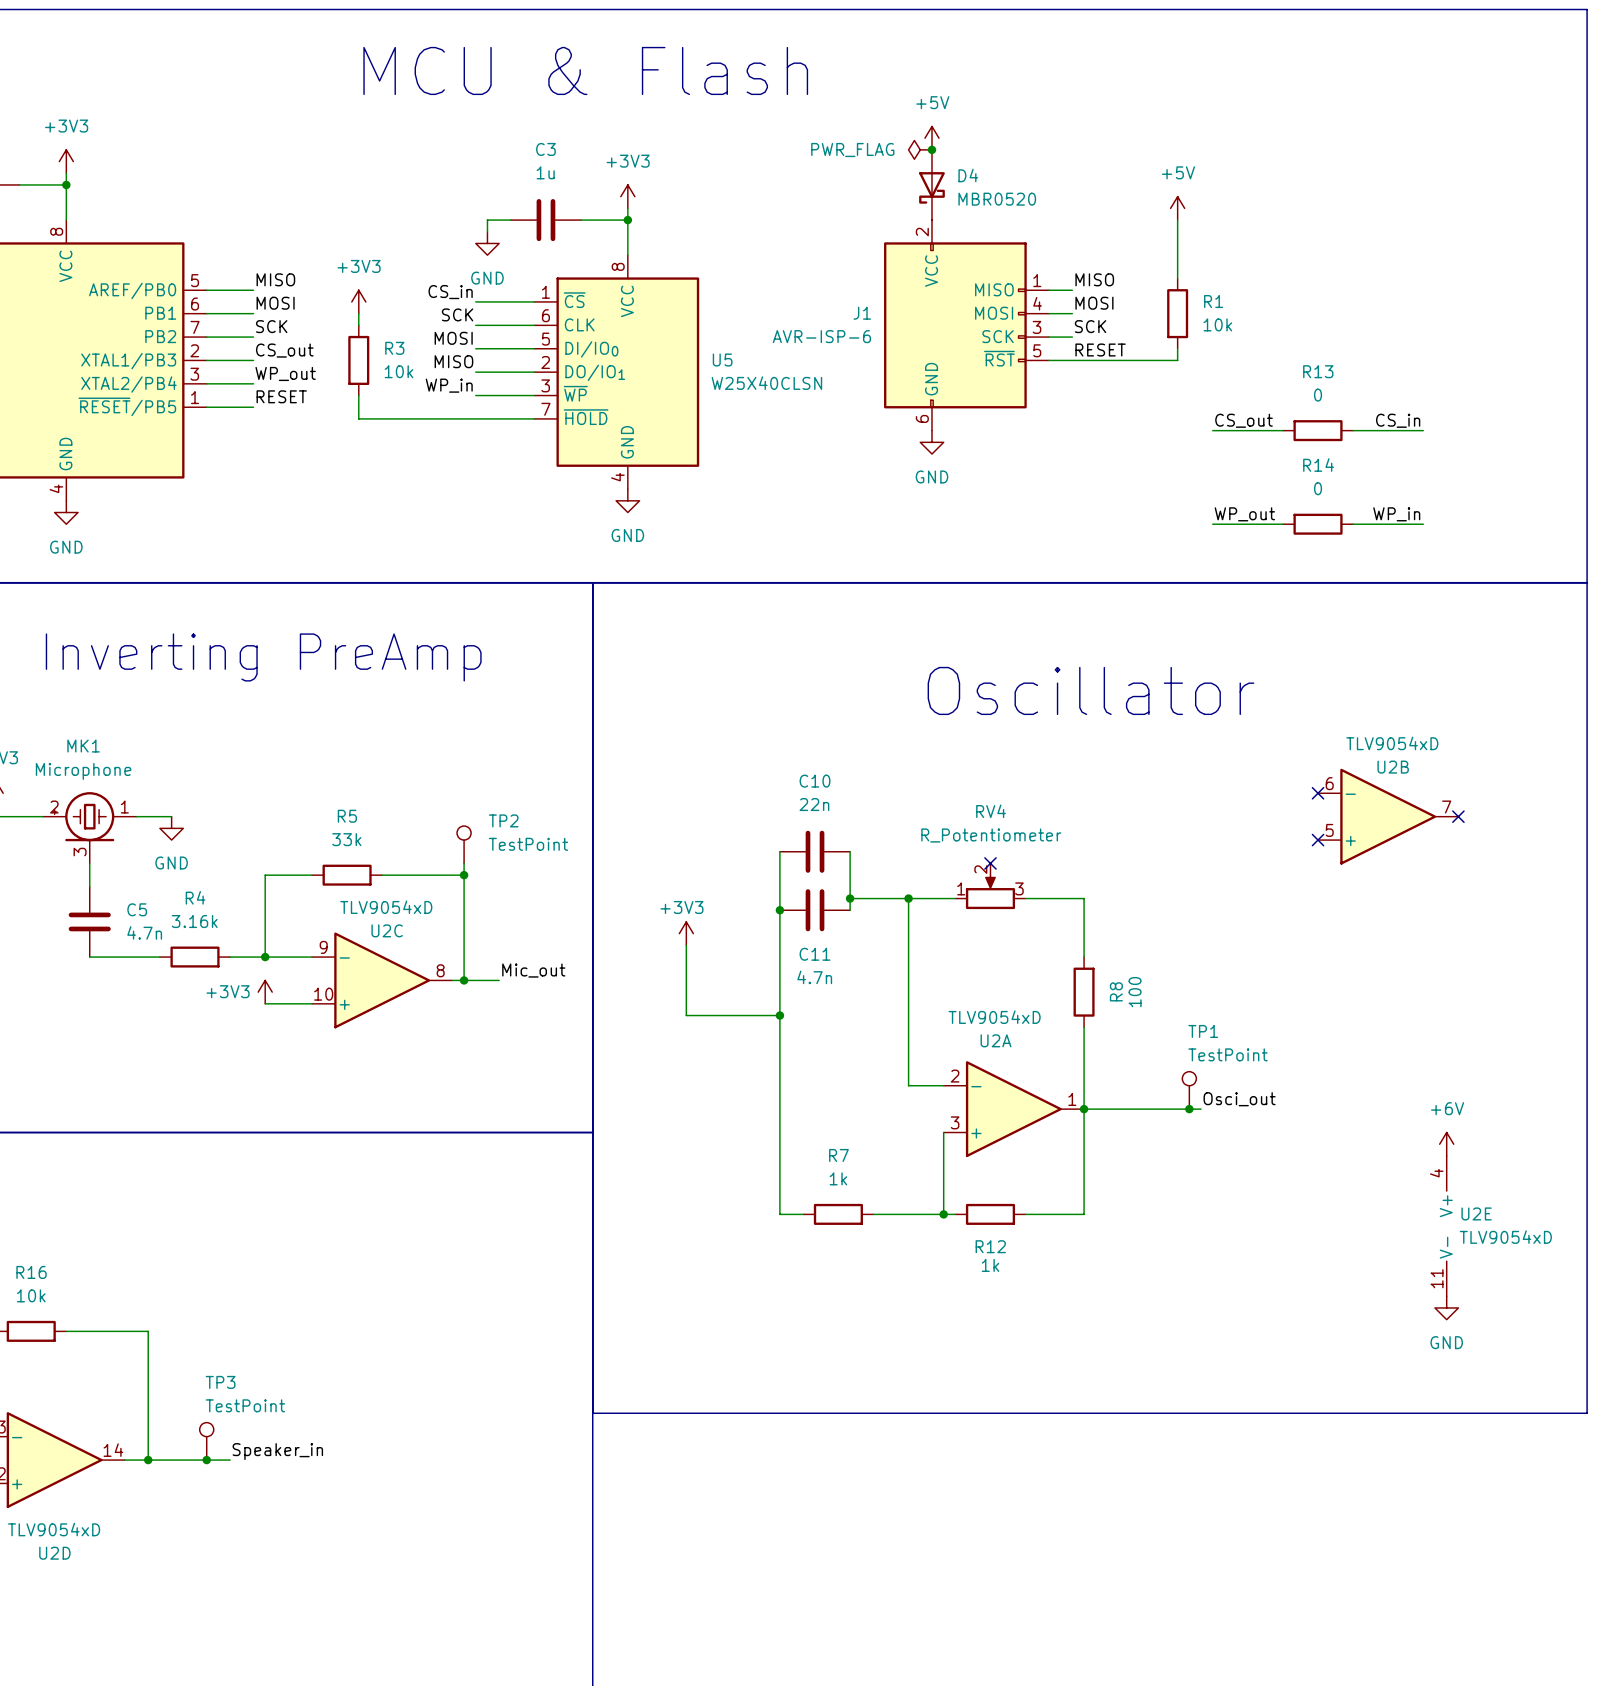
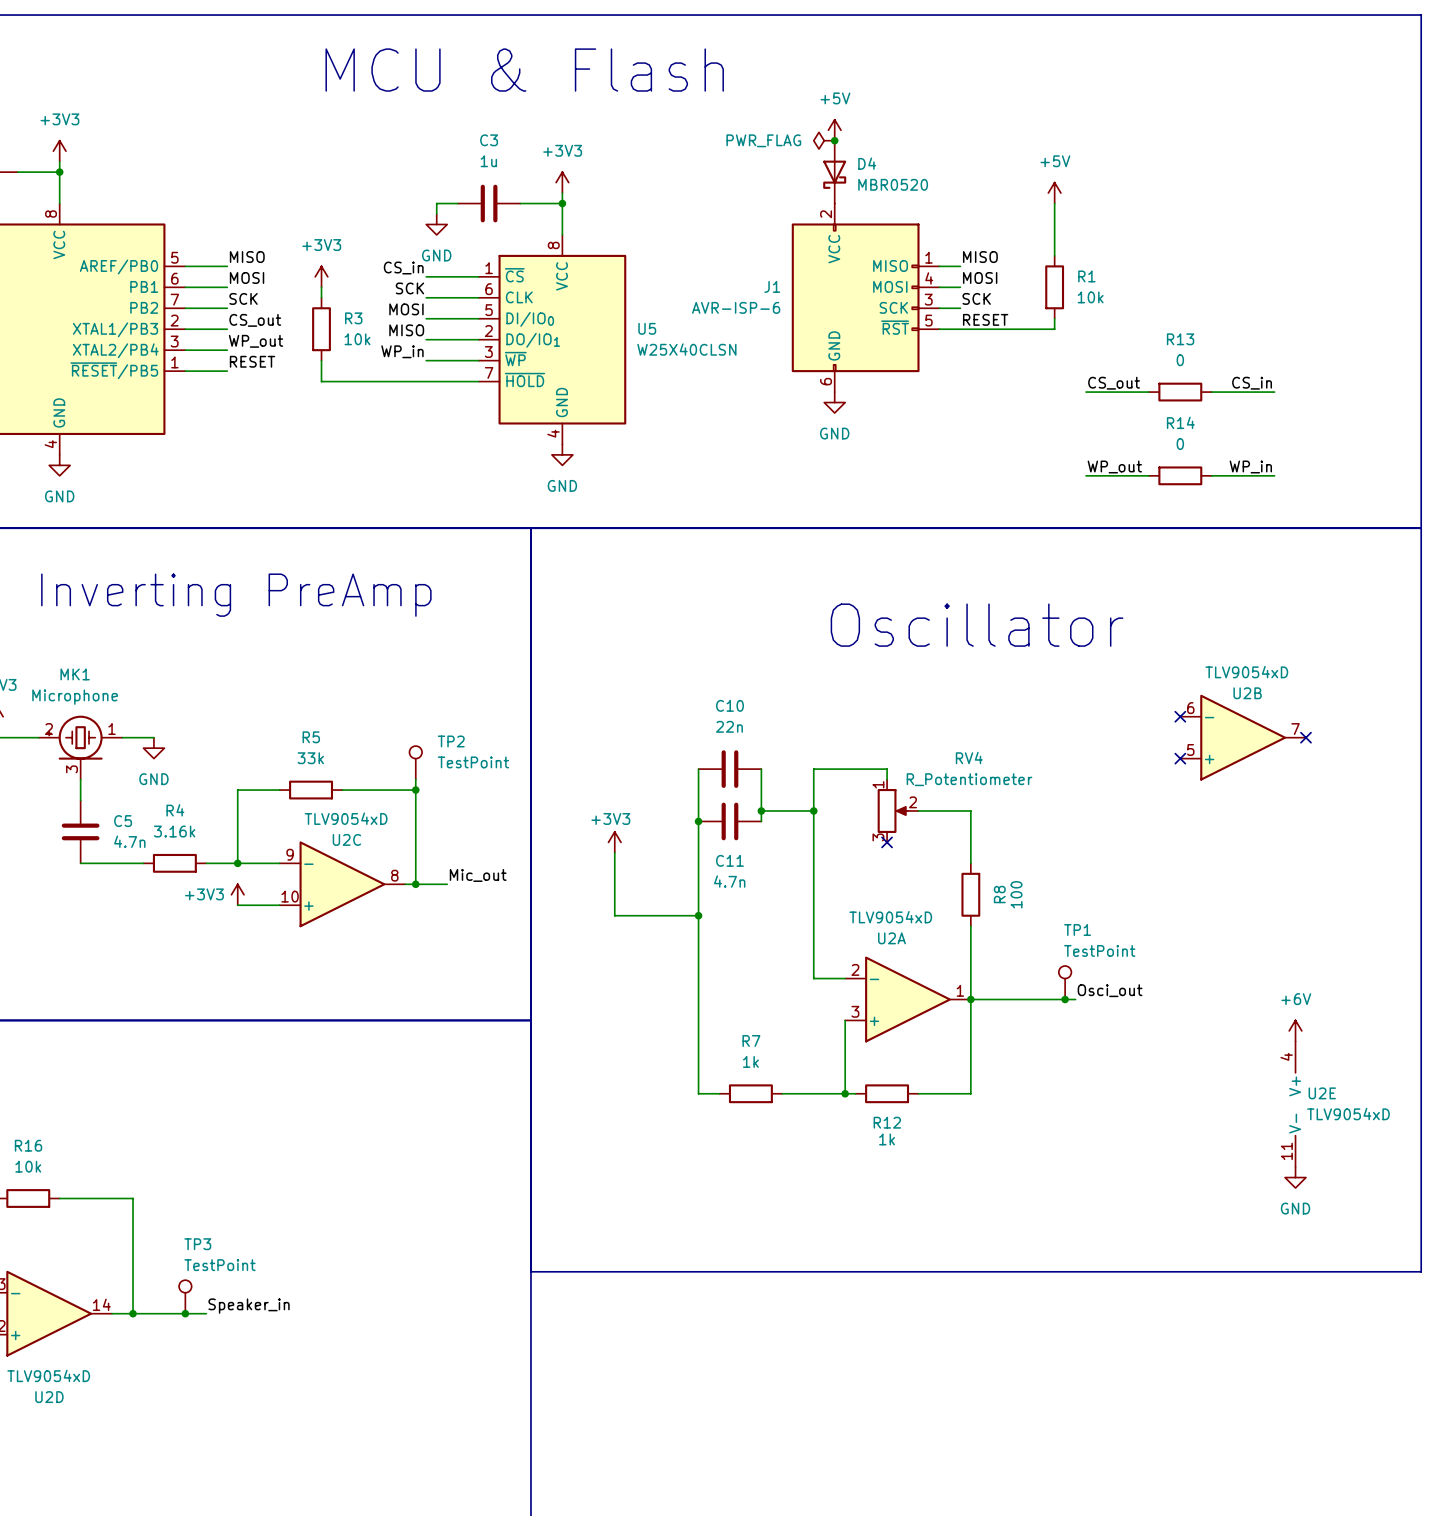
RV4 name position: RV4 (991, 811) -> RV4 (969, 757)
RV4 value position: R_Potentiometer (991, 835) -> R_Potentiometer (969, 779)
no-connect mark: (990, 863) -> none
RV4 rotation: 0° (990, 892) -> 90° clockwise (892, 810)
wire: (908, 898) (955, 898) -> (813, 810) (813, 769) (887, 769) (887, 779)
no-connect mark: none -> (887, 842)

